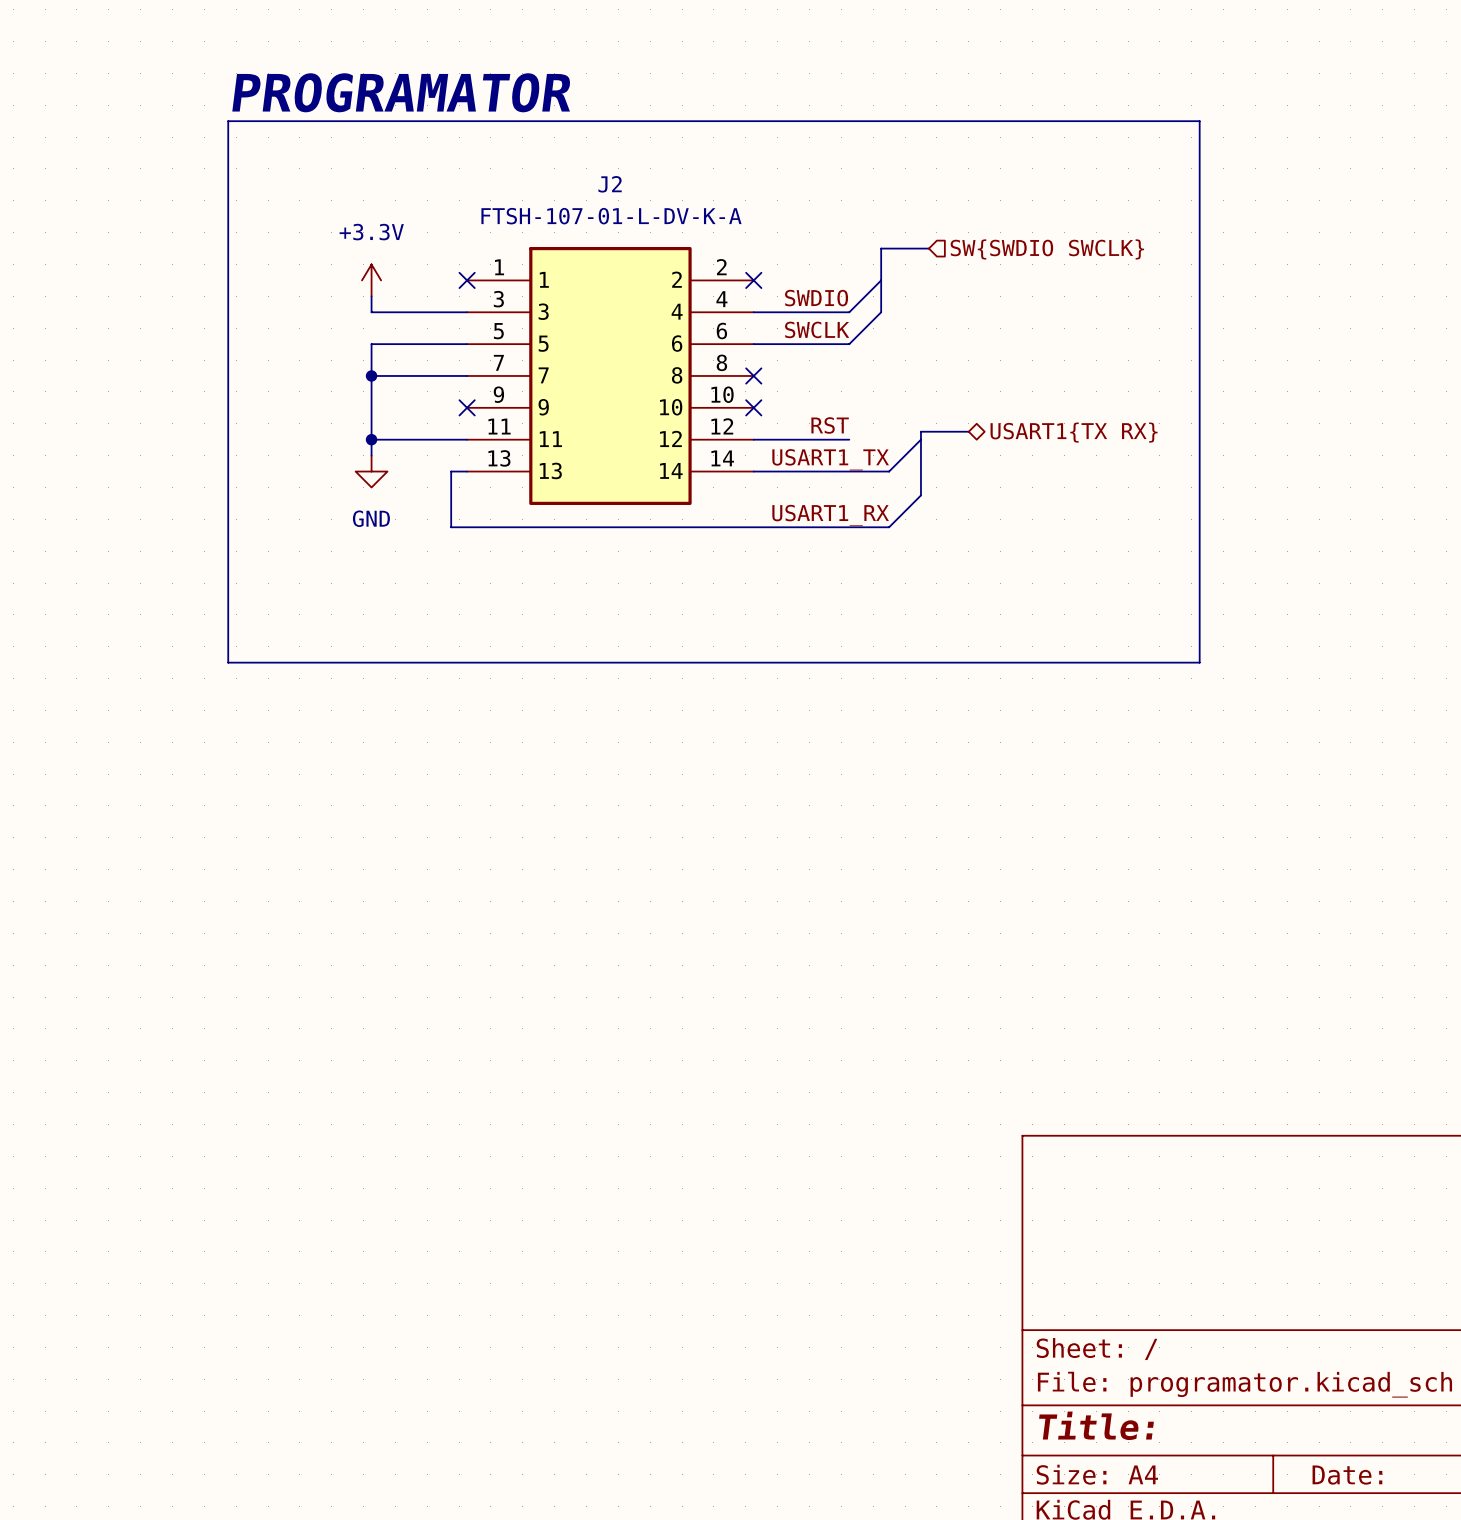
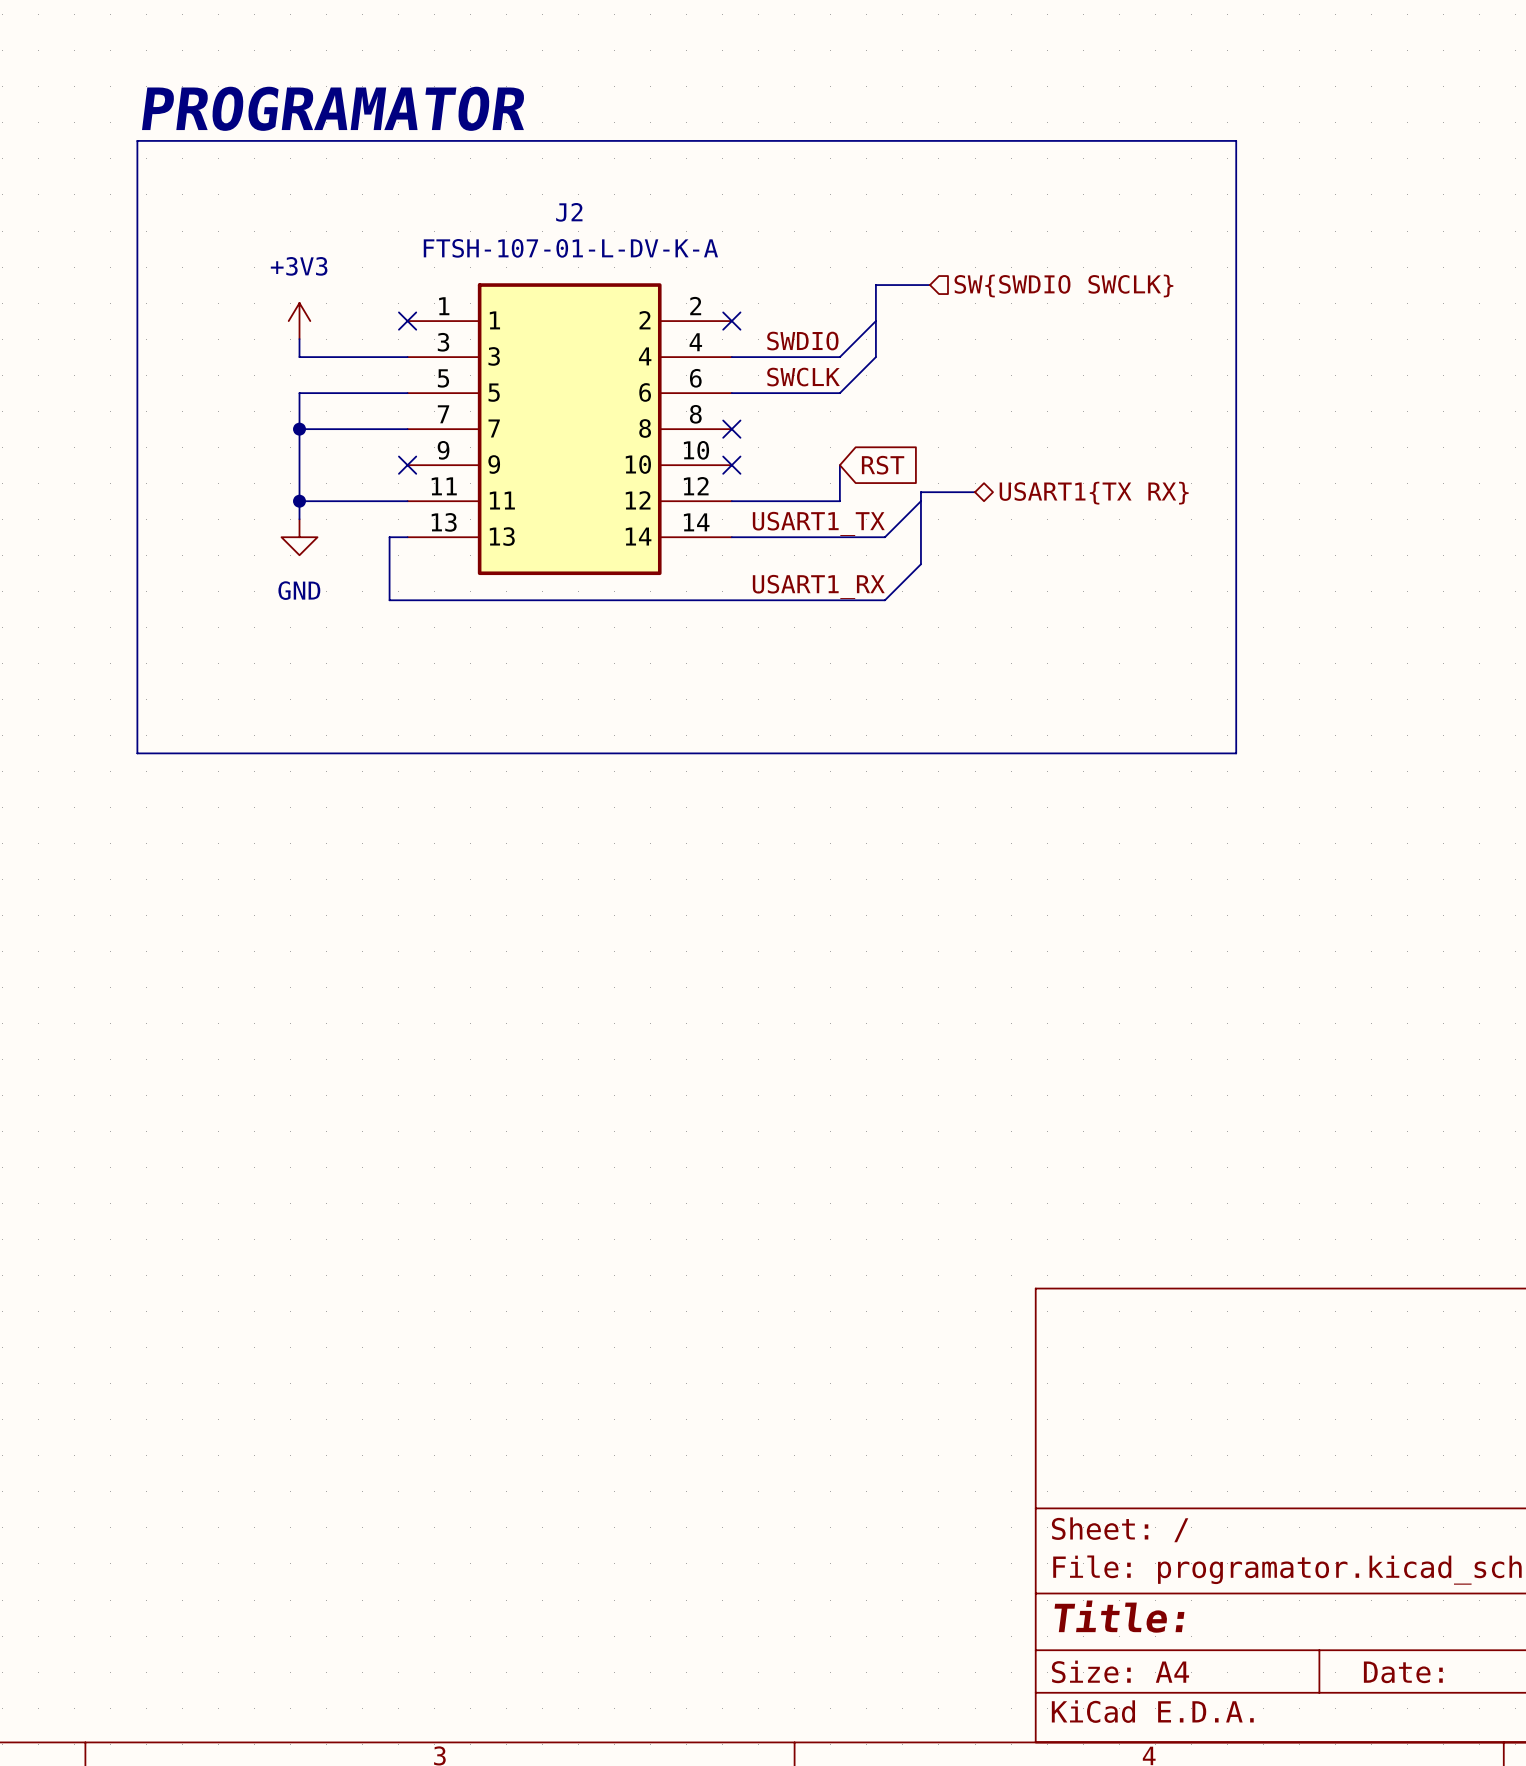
power symbol: +3.3V (371, 280) -> +3V3 (299, 321)
wire: none -> (839, 465) (839, 501)
global label: none -> RST (883, 465)
label: RST (830, 425) -> none

